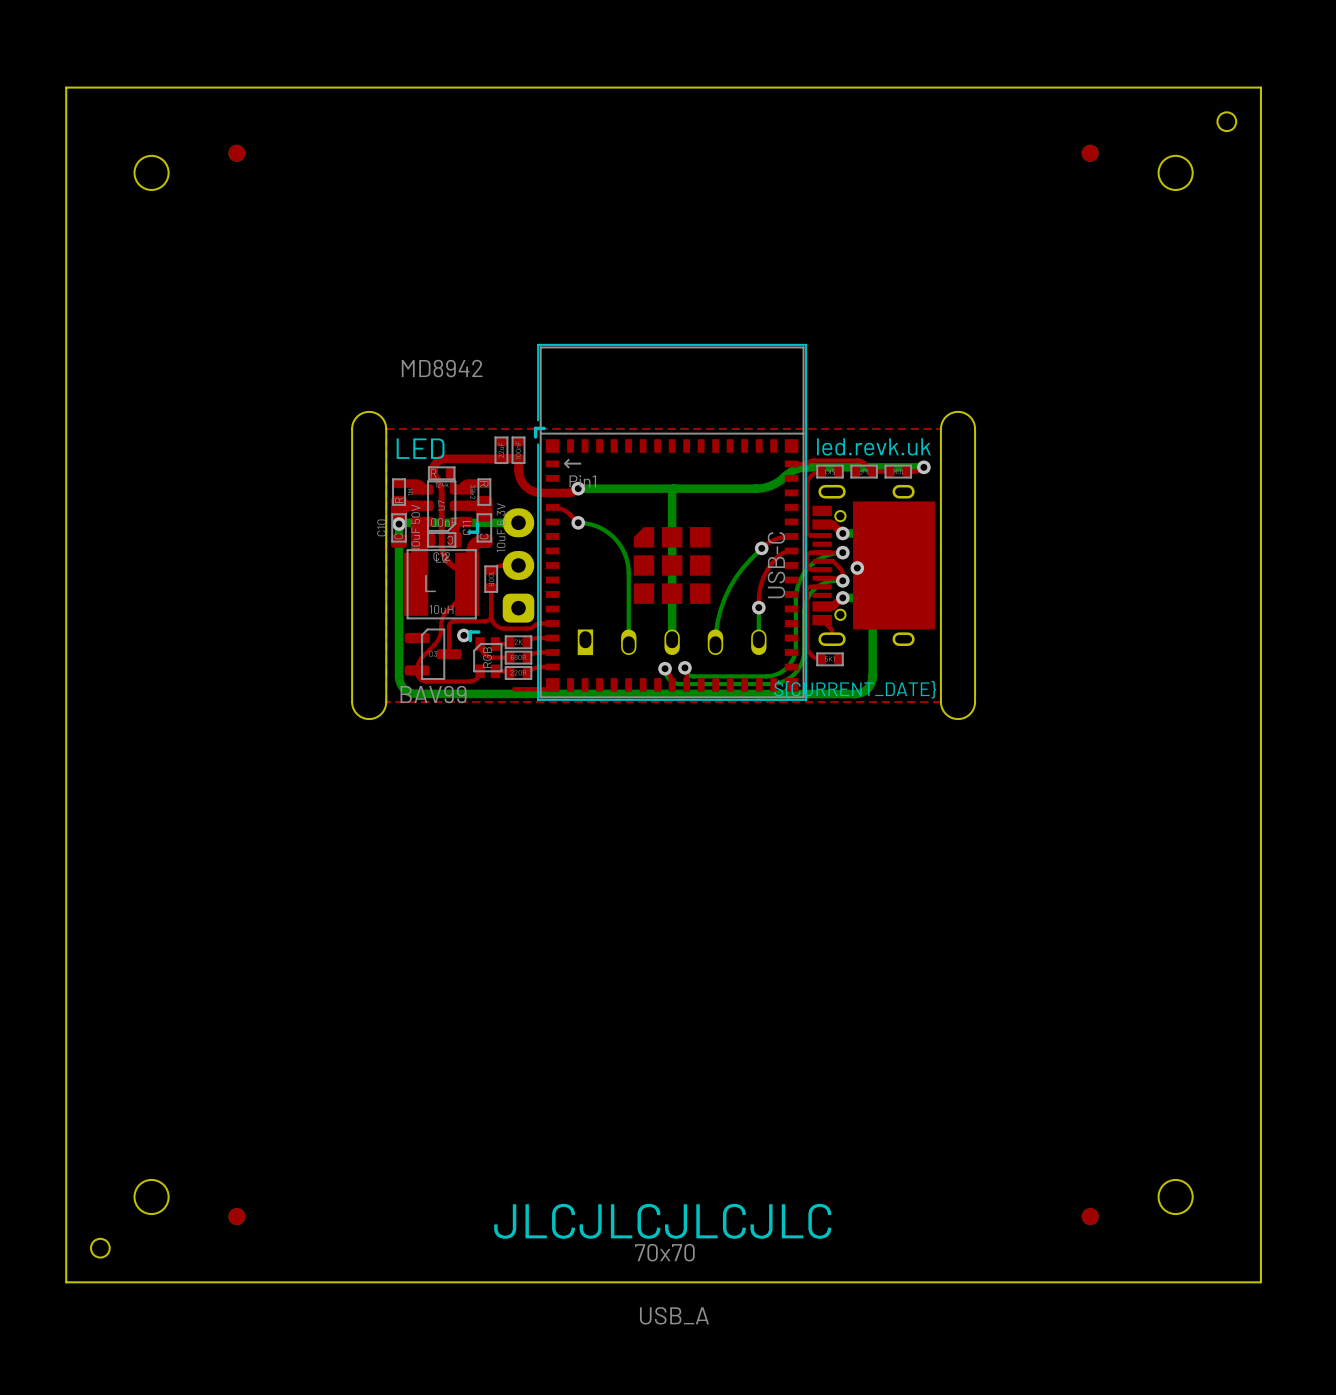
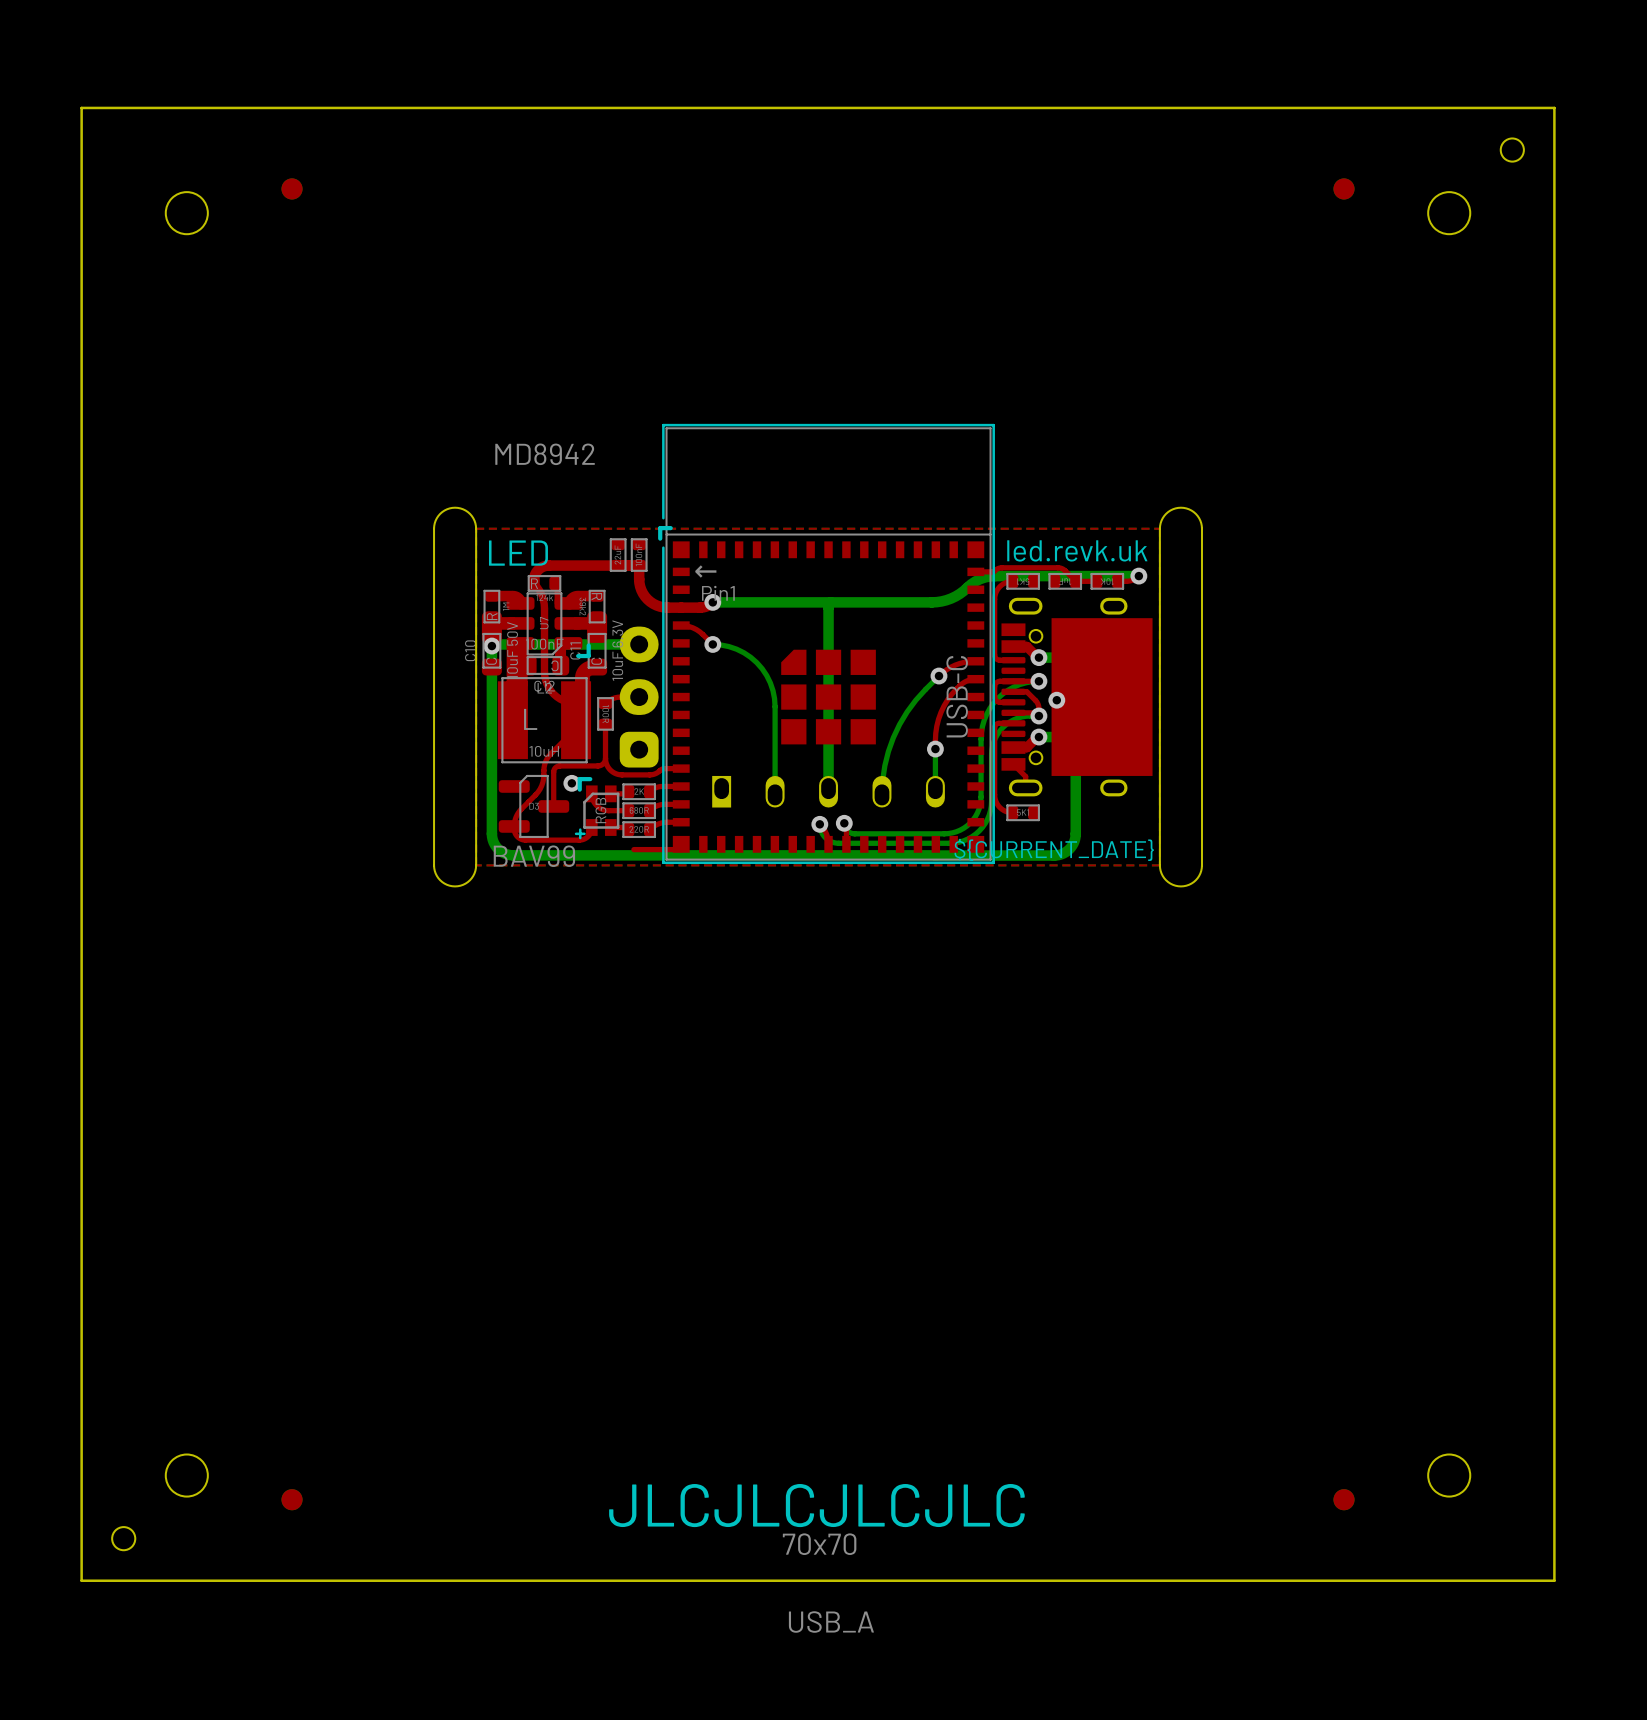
part footprint: [468, 630, 503, 679] -> [574, 777, 620, 840]

